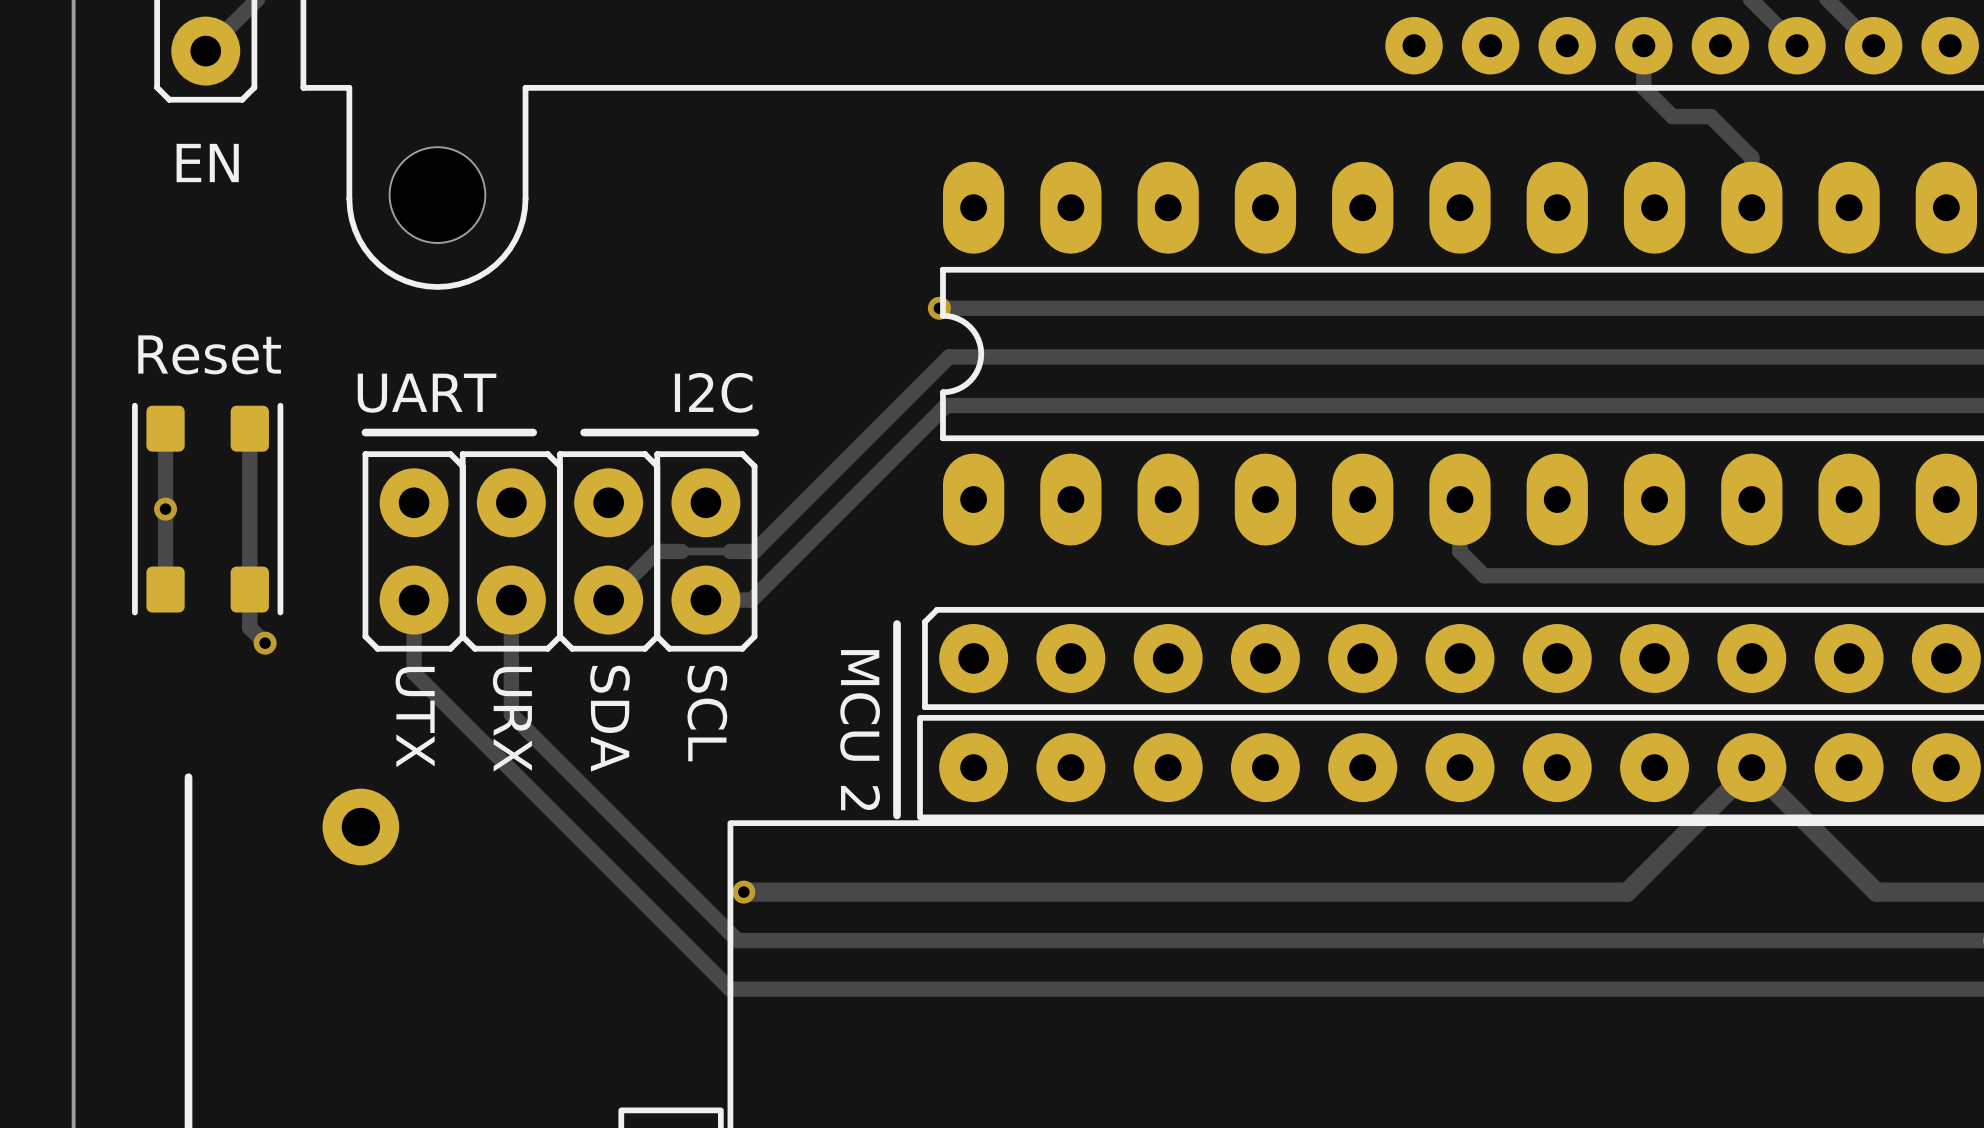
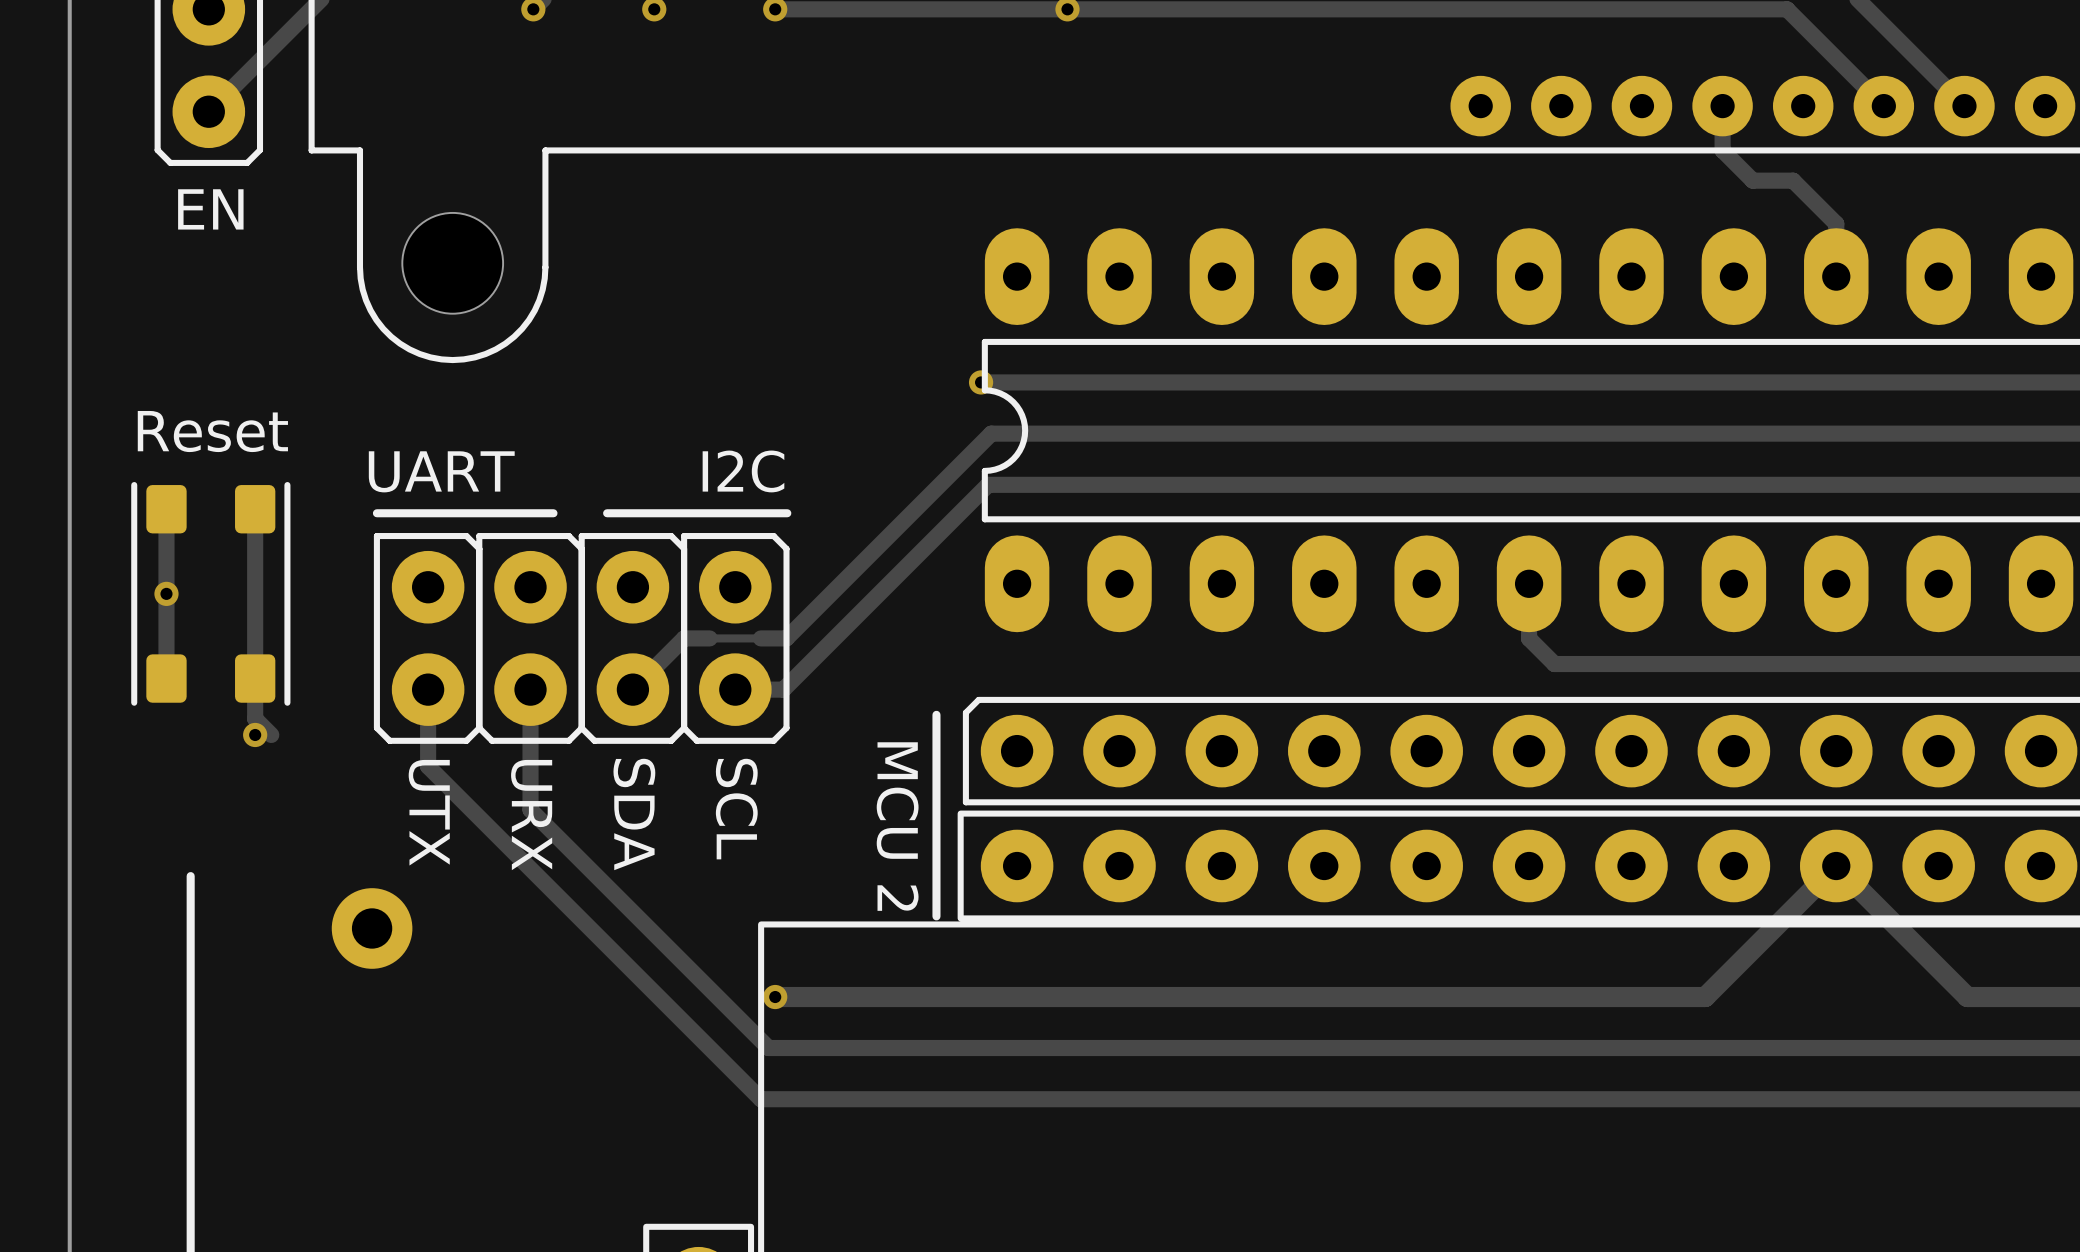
text position: EN (207, 163) -> EN (210, 209)
via position: (265, 643) -> (255, 734)

